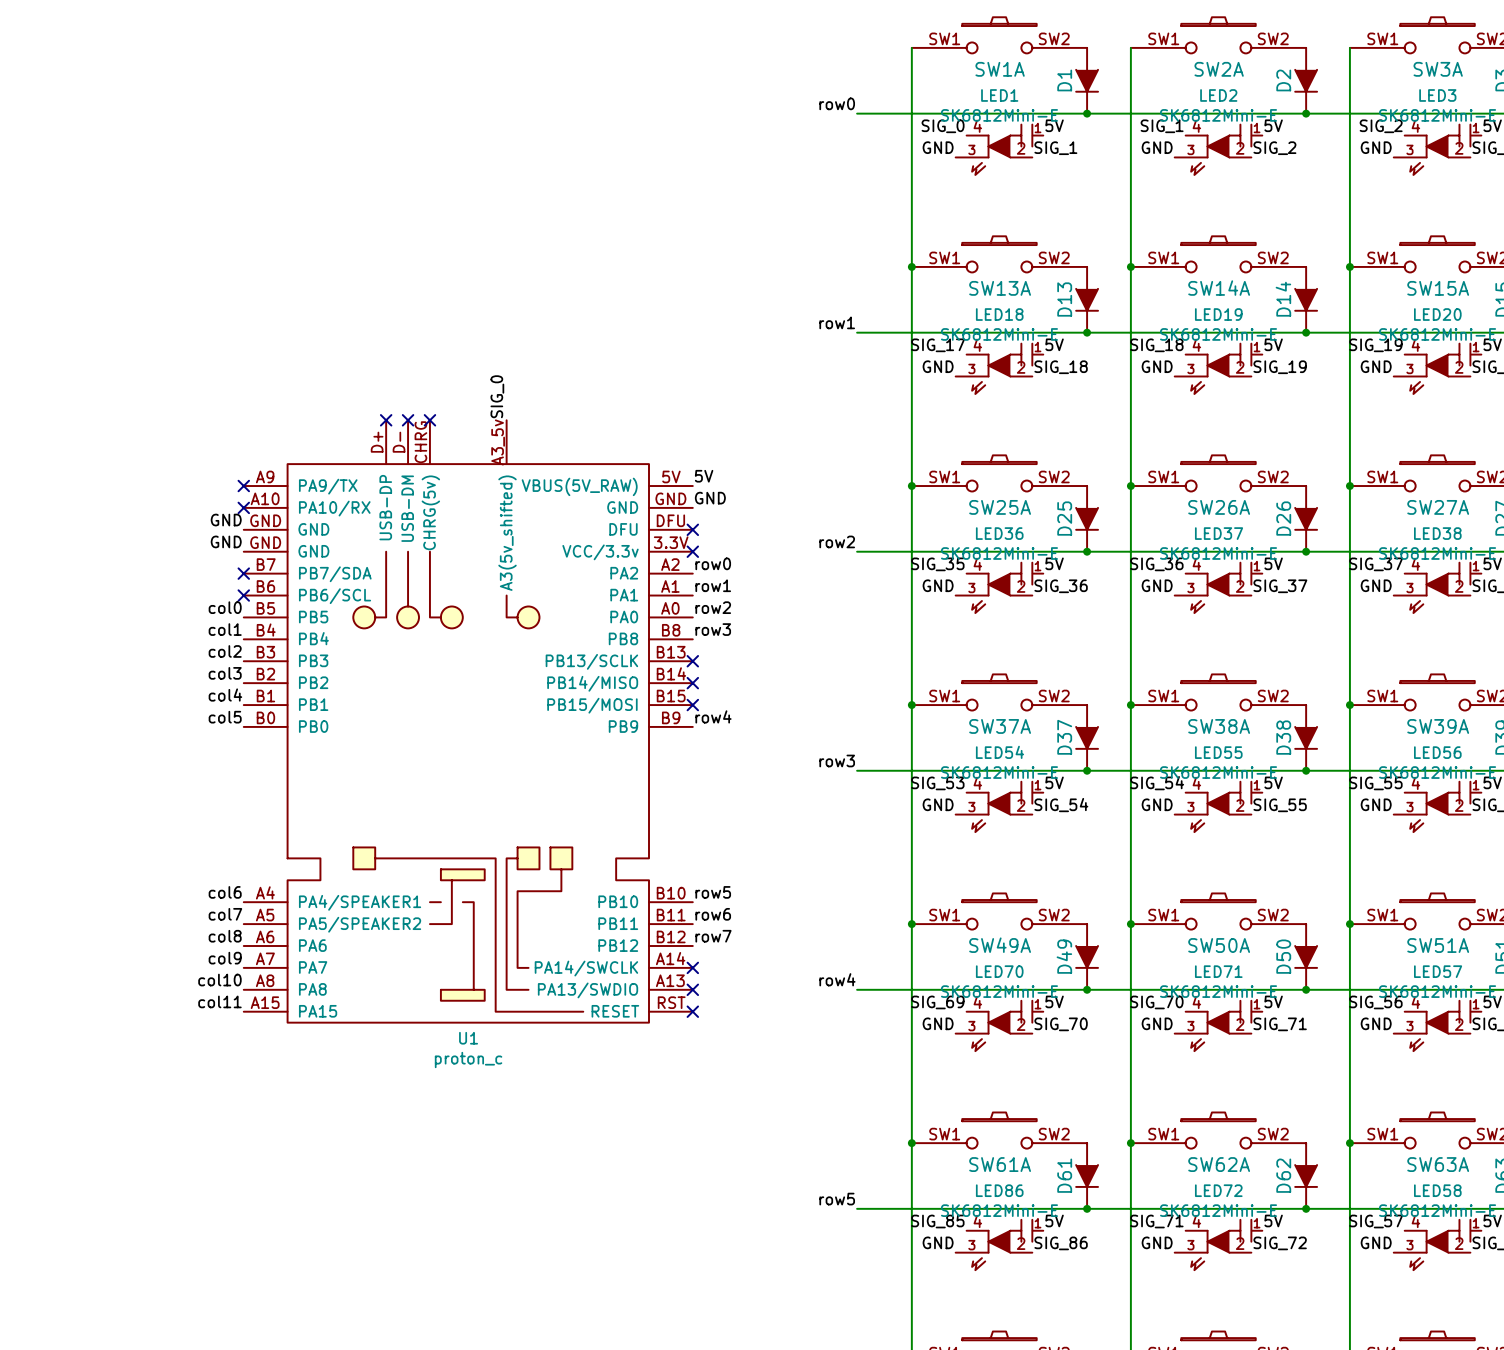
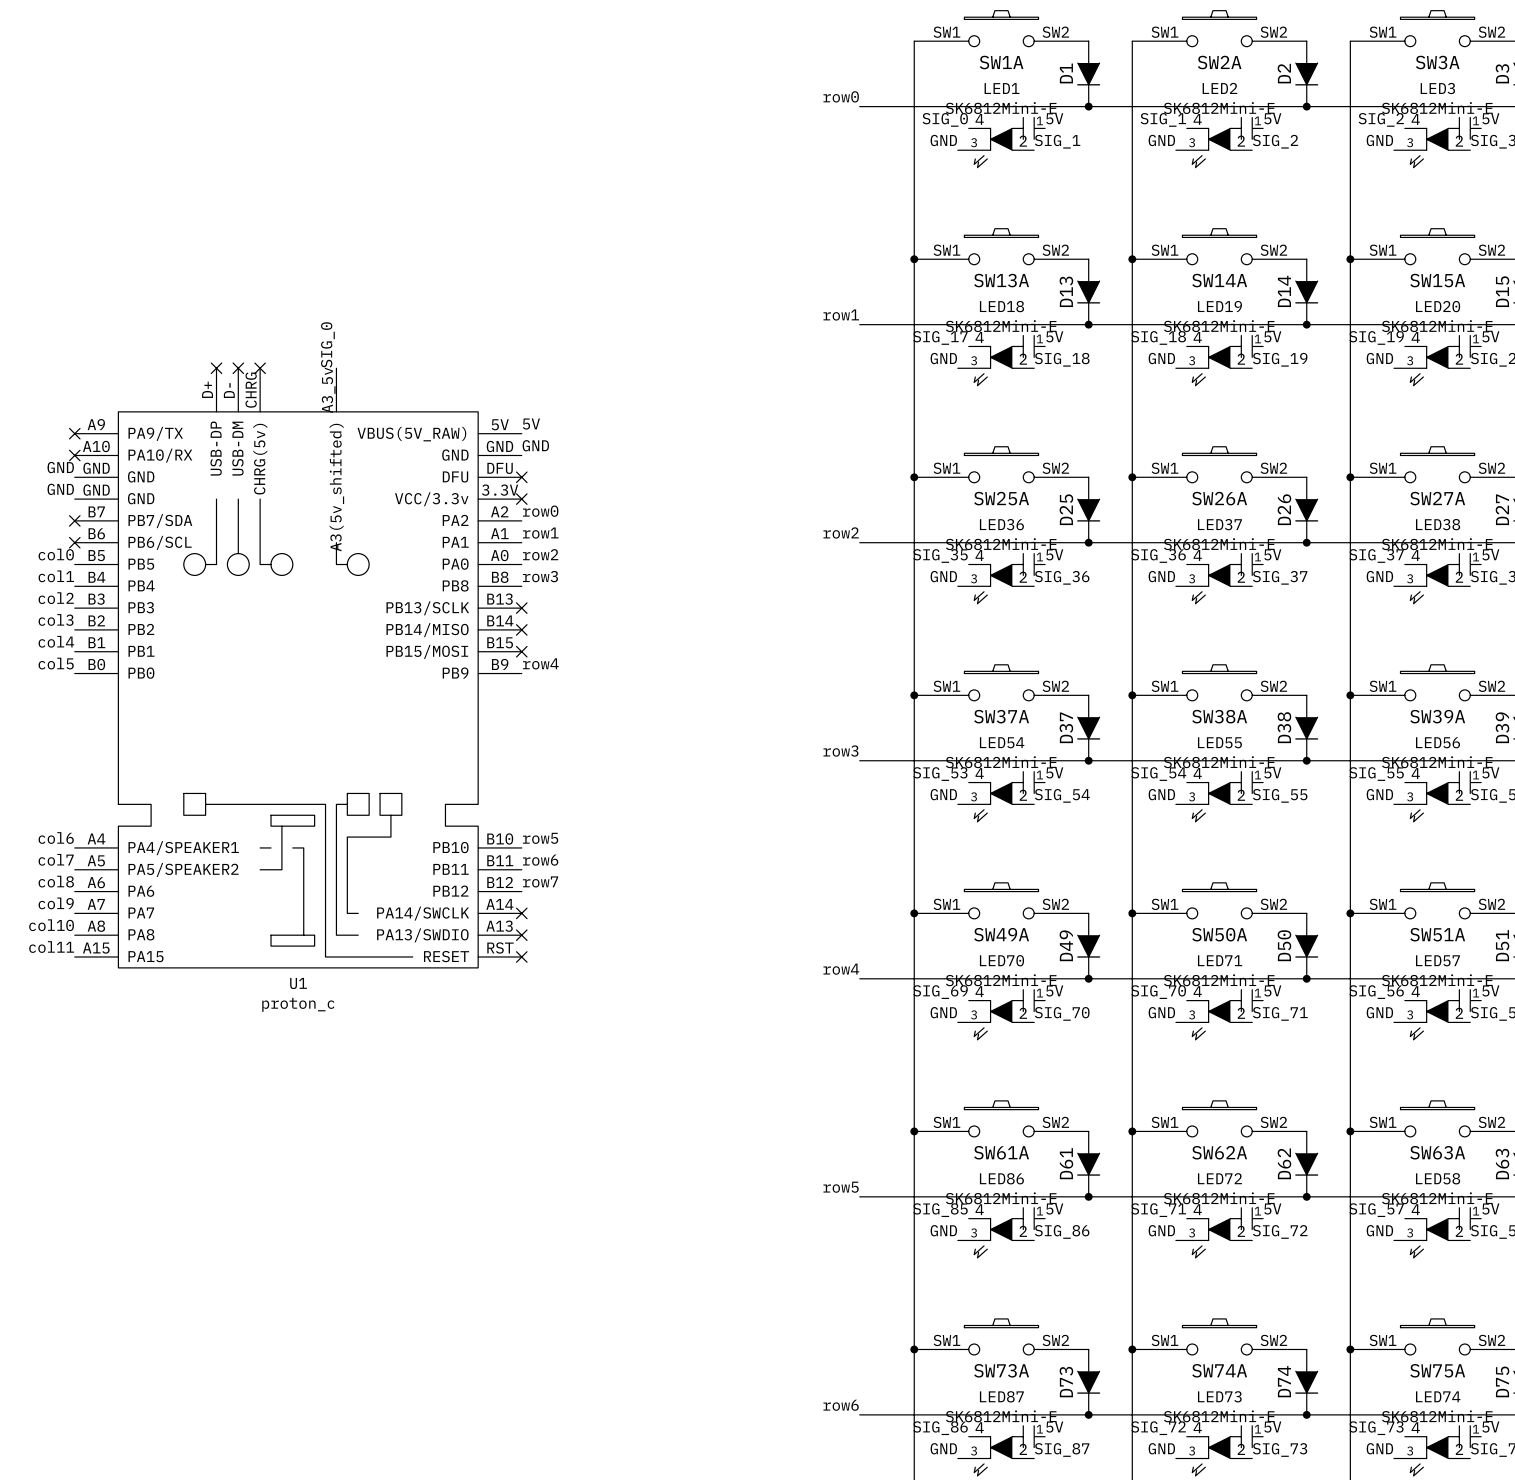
no-connect mark: none -> (216, 368)
no-connect mark: none -> (238, 368)
no-connect mark: none -> (260, 368)
label position: SIG_0 (497, 396) -> SIG_0 (327, 344)
no-connect mark: (386, 420) -> none
no-connect mark: (408, 420) -> none
no-connect mark: (429, 420) -> none
no-connect mark: none -> (74, 433)
label: none -> GND (535, 445)
no-connect mark: none -> (74, 455)
label: none -> GND (60, 467)
label position: 5V (704, 476) -> 5V (531, 424)
no-connect mark: (243, 486) -> none
no-connect mark: none -> (521, 477)
label: none -> GND (60, 489)
label: GND (710, 498) -> none
no-connect mark: (243, 507) -> none
no-connect mark: none -> (521, 499)
label: GND (226, 520) -> none
no-connect mark: none -> (74, 520)
no-connect mark: (692, 529) -> none
label: GND (226, 541) -> none
no-connect mark: none -> (74, 542)
no-connect mark: (692, 551) -> none
label position: row0 (713, 563) -> row0 (540, 511)
no-connect mark: (243, 573) -> none
label position: row1 (713, 585) -> row1 (540, 533)
no-connect mark: (243, 595) -> none
label position: col0 (225, 607) -> col0 (56, 554)
label position: row2 (713, 607) -> row2 (540, 554)
no-connect mark: none -> (521, 608)
label position: col1 (225, 629) -> col1 (56, 576)
label position: row3 (713, 629) -> row3 (540, 576)
no-connect mark: none -> (521, 629)
label position: col2 (225, 651) -> col2 (56, 598)
no-connect mark: none -> (521, 651)
no-connect mark: (692, 661) -> none
label position: col3 (225, 673) -> col3 (56, 619)
no-connect mark: (692, 683) -> none
label position: col4 (225, 695) -> col4 (56, 641)
no-connect mark: (692, 705) -> none
label position: row4 (713, 716) -> row4 (540, 663)
label position: col5 (225, 717) -> col5 (56, 663)
U1 position: (468, 721) -> (298, 668)
label position: col6 (225, 892) -> col6 (56, 838)
label position: row5 (713, 892) -> row5 (540, 838)
label position: col7 (225, 914) -> col7 (56, 859)
label position: row6 (713, 914) -> row6 (540, 860)
no-connect mark: none -> (521, 913)
label position: col8 (225, 936) -> col8 (56, 881)
label position: row7 (713, 936) -> row7 (540, 881)
no-connect mark: none -> (521, 935)
label position: col9 (225, 958) -> col9 (56, 903)
no-connect mark: none -> (521, 956)
no-connect mark: (692, 967) -> none
label position: col10 (219, 980) -> col10 (51, 925)
no-connect mark: (692, 989) -> none
label position: col11 (219, 1001) -> col11 (51, 947)
no-connect mark: (692, 1011) -> none

